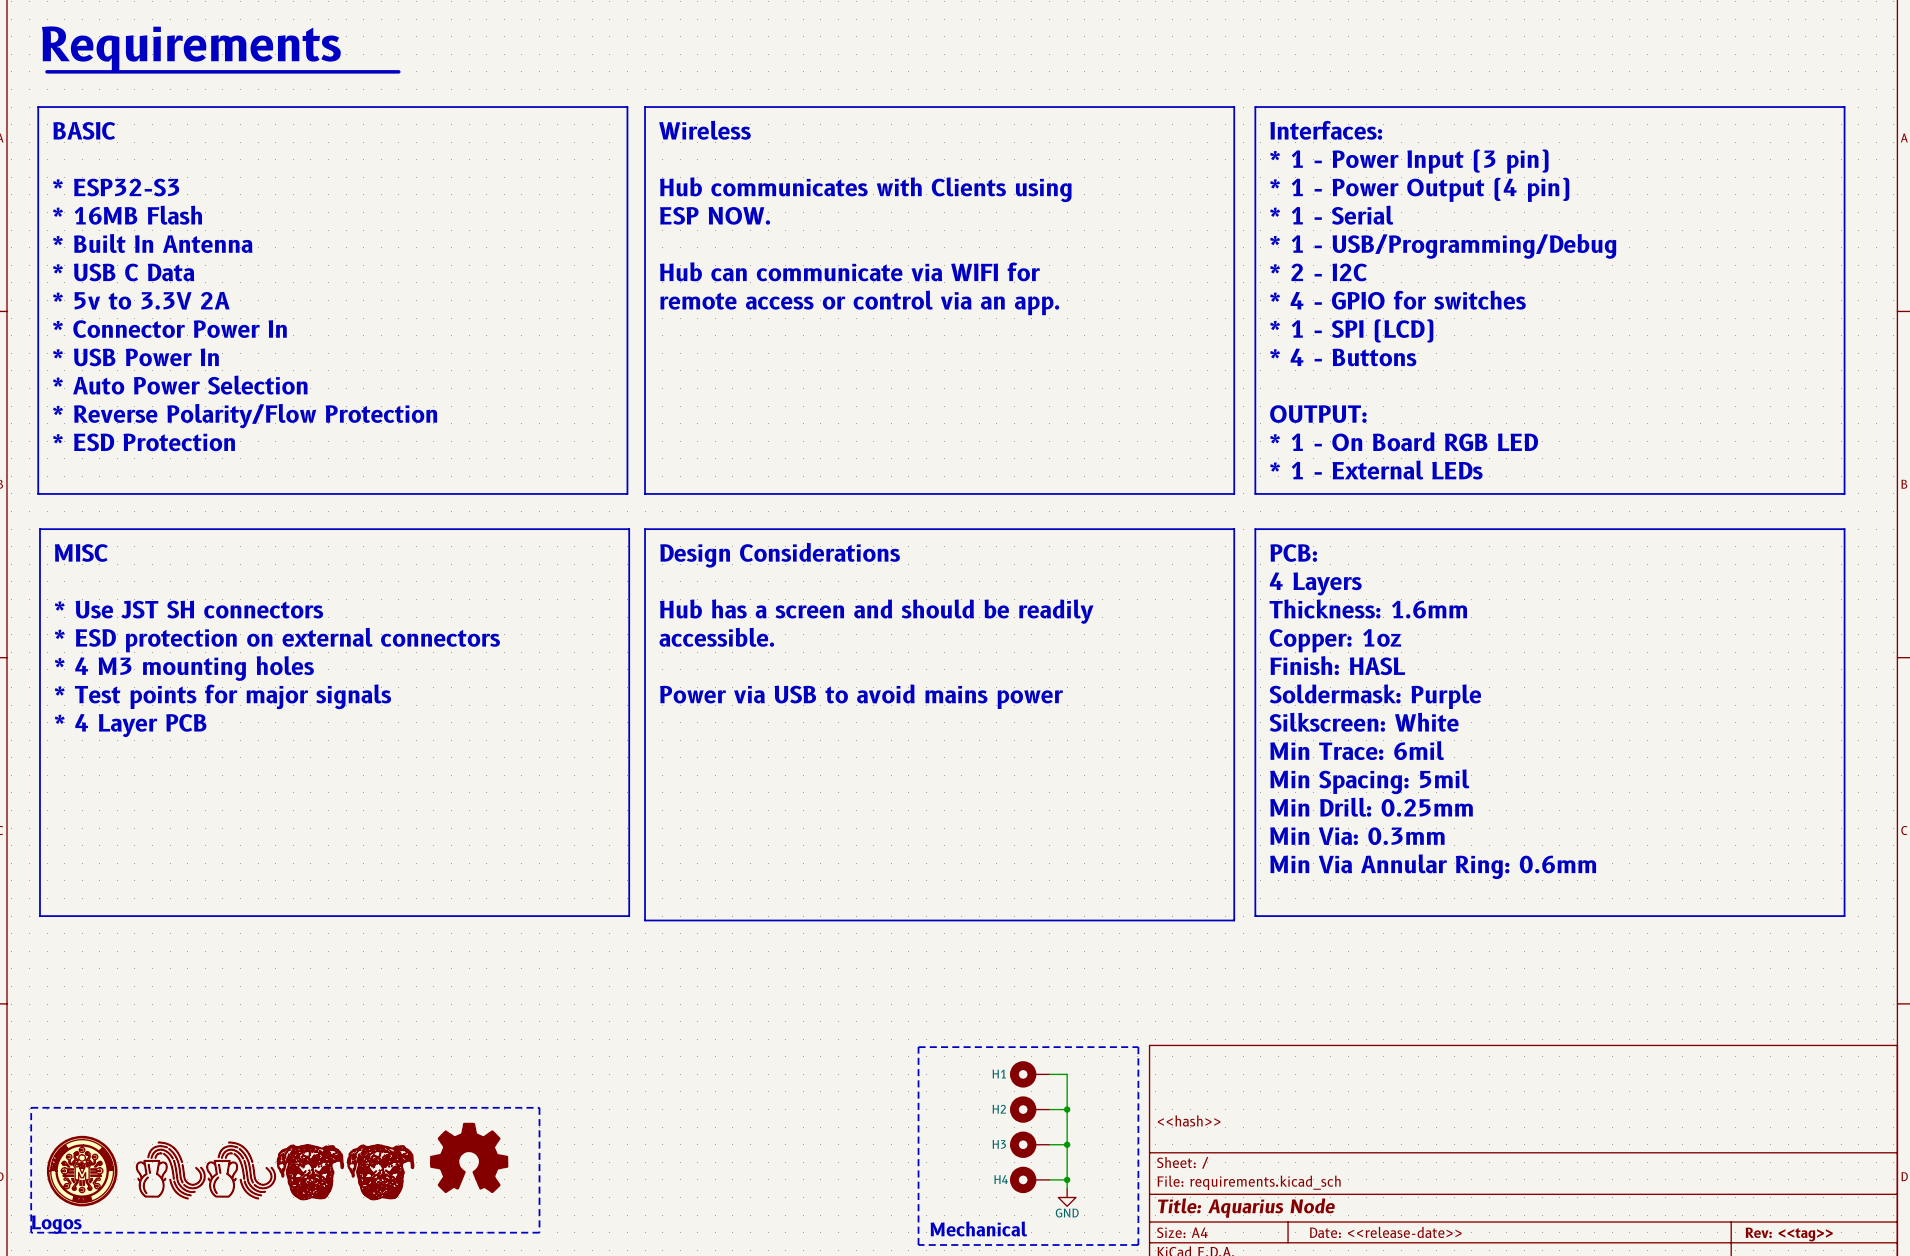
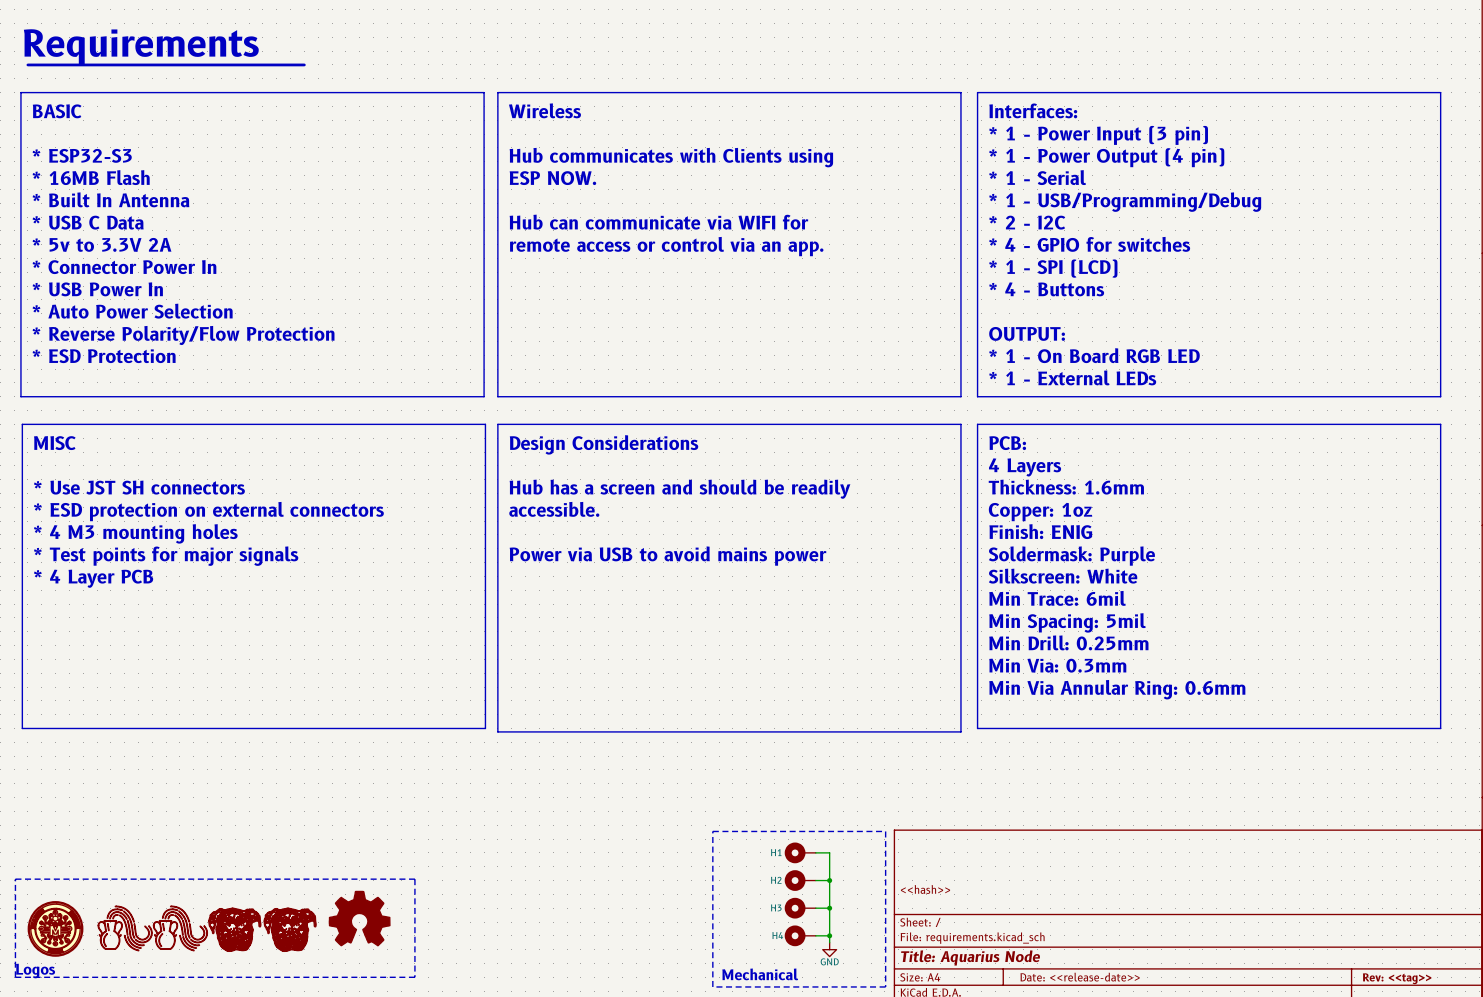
text: Finish: HASL (1337, 665) -> Finish: ENIG (1040, 531)

